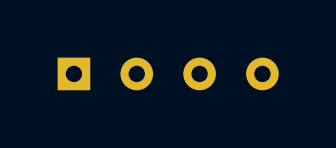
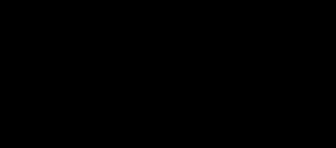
part: (168, 73) -> none

